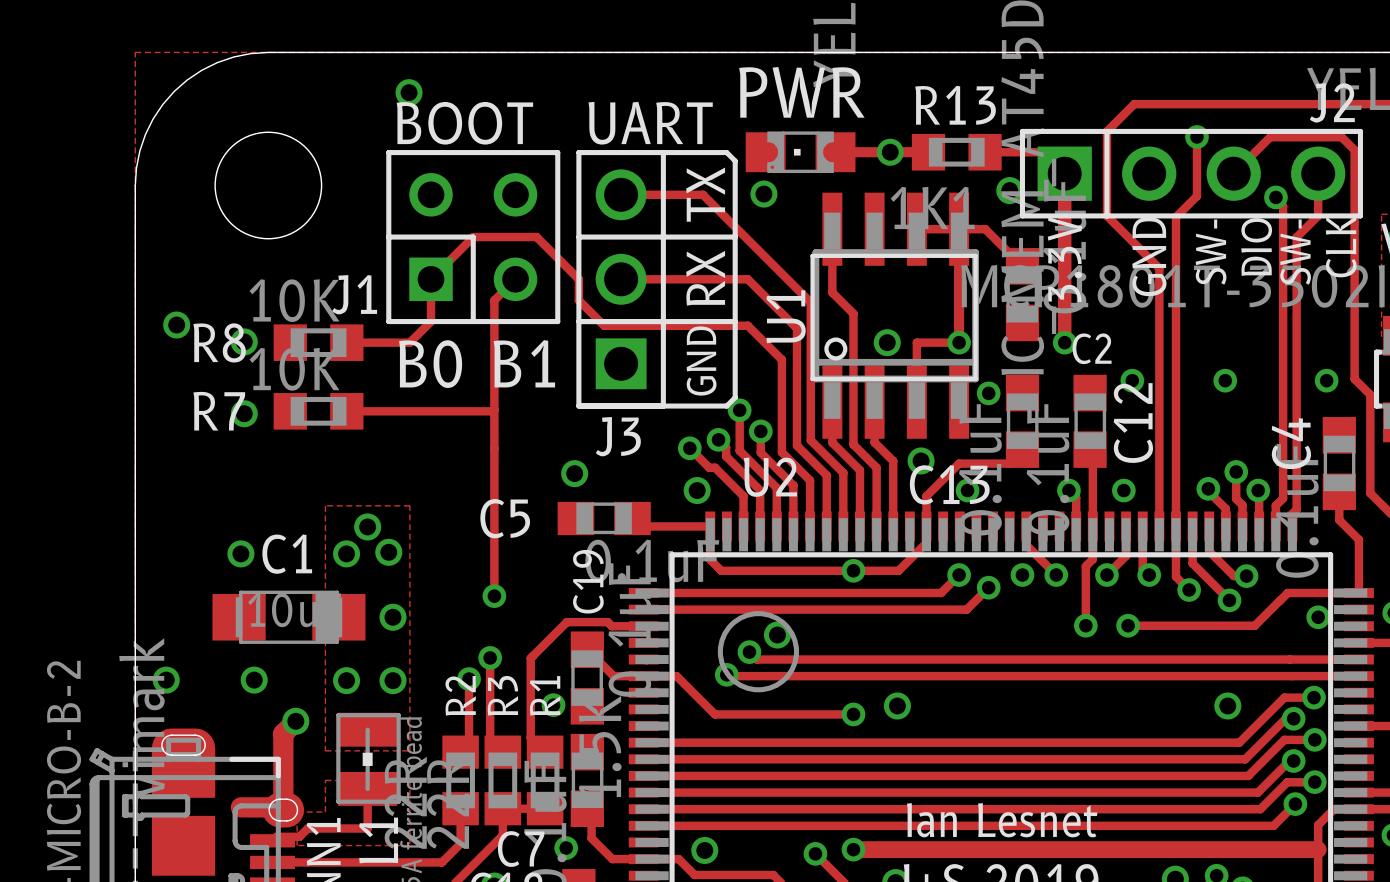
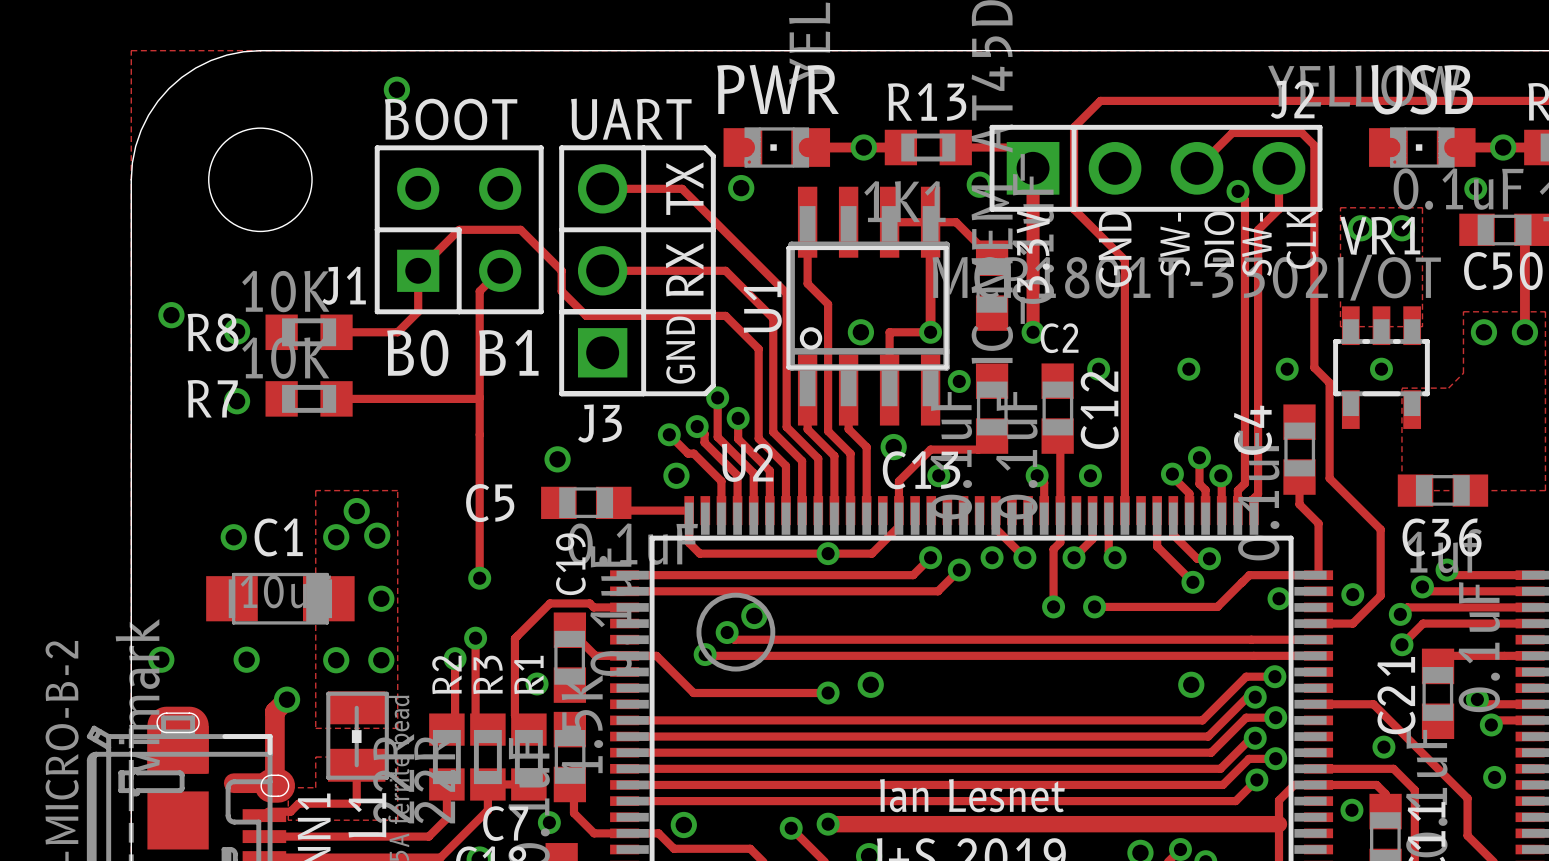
track: (1196, 136) (1196, 196) (1175, 217) (1175, 576) (1189, 590) -> none
via: (1196, 136) -> none
via: (1189, 590) -> none

